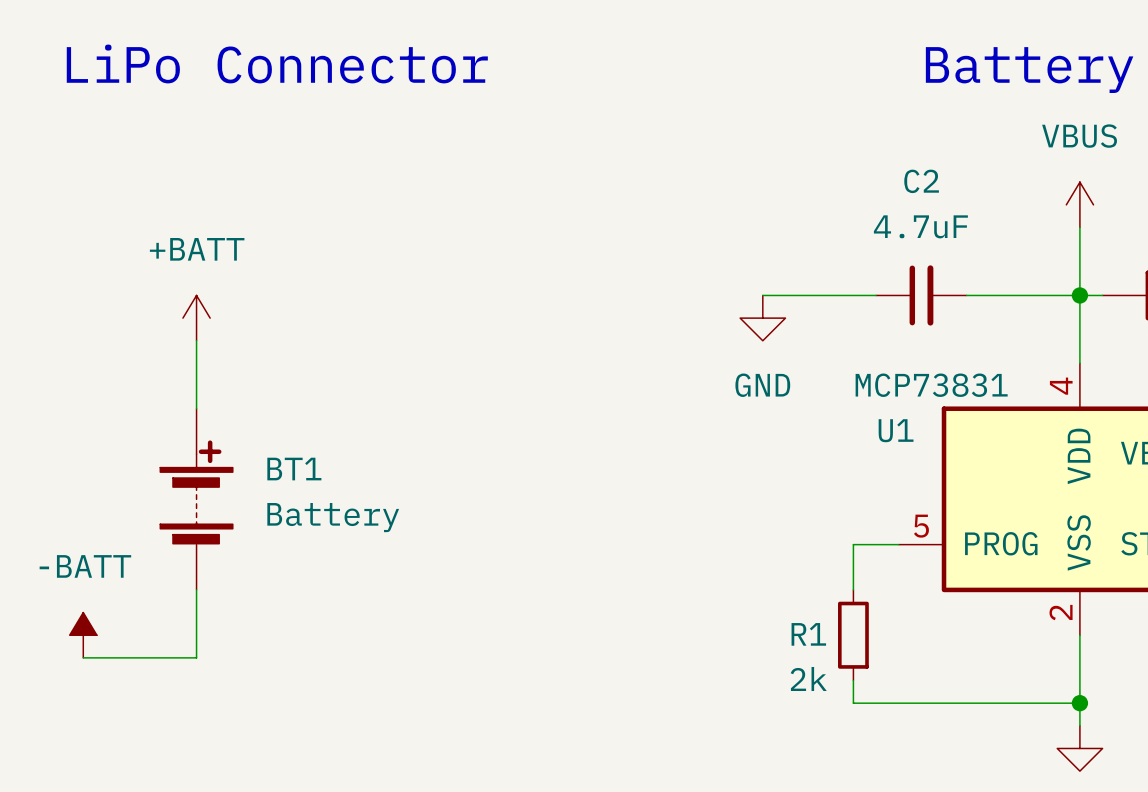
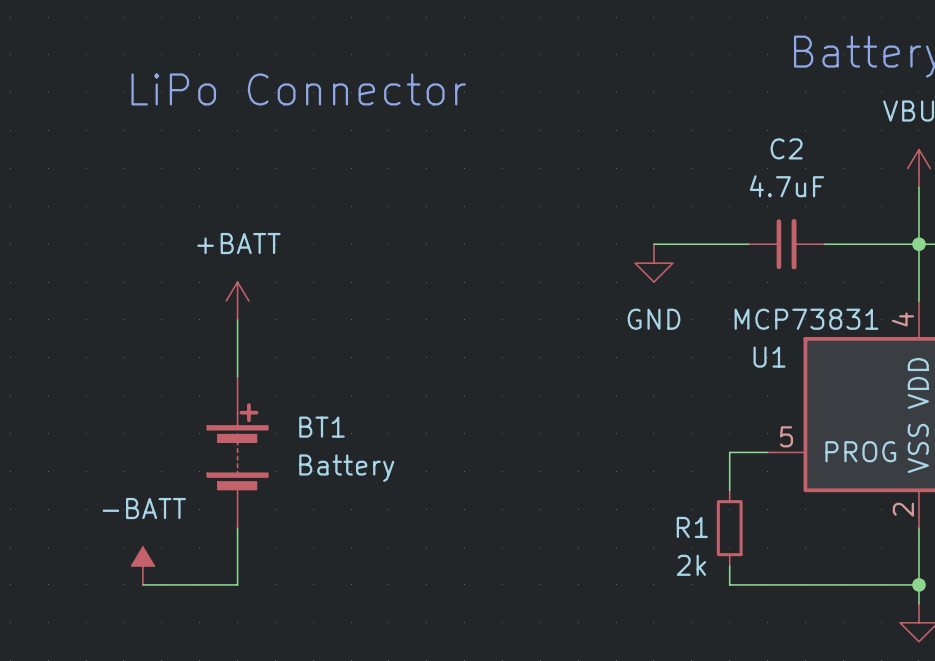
text position: LiPo Connector (277, 63) -> LiPo Connector (298, 89)
power symbol position: +BATT (196, 318) -> +BATT (237, 301)
wire: (196, 340) (196, 408) -> (237, 319) (237, 376)
BT1 position: (196, 499) -> (237, 452)
wire: (196, 589) (196, 657) (83, 657) -> (237, 528) (237, 584) (142, 584)
power symbol position: -BATT (83, 635) -> -BATT (142, 566)

